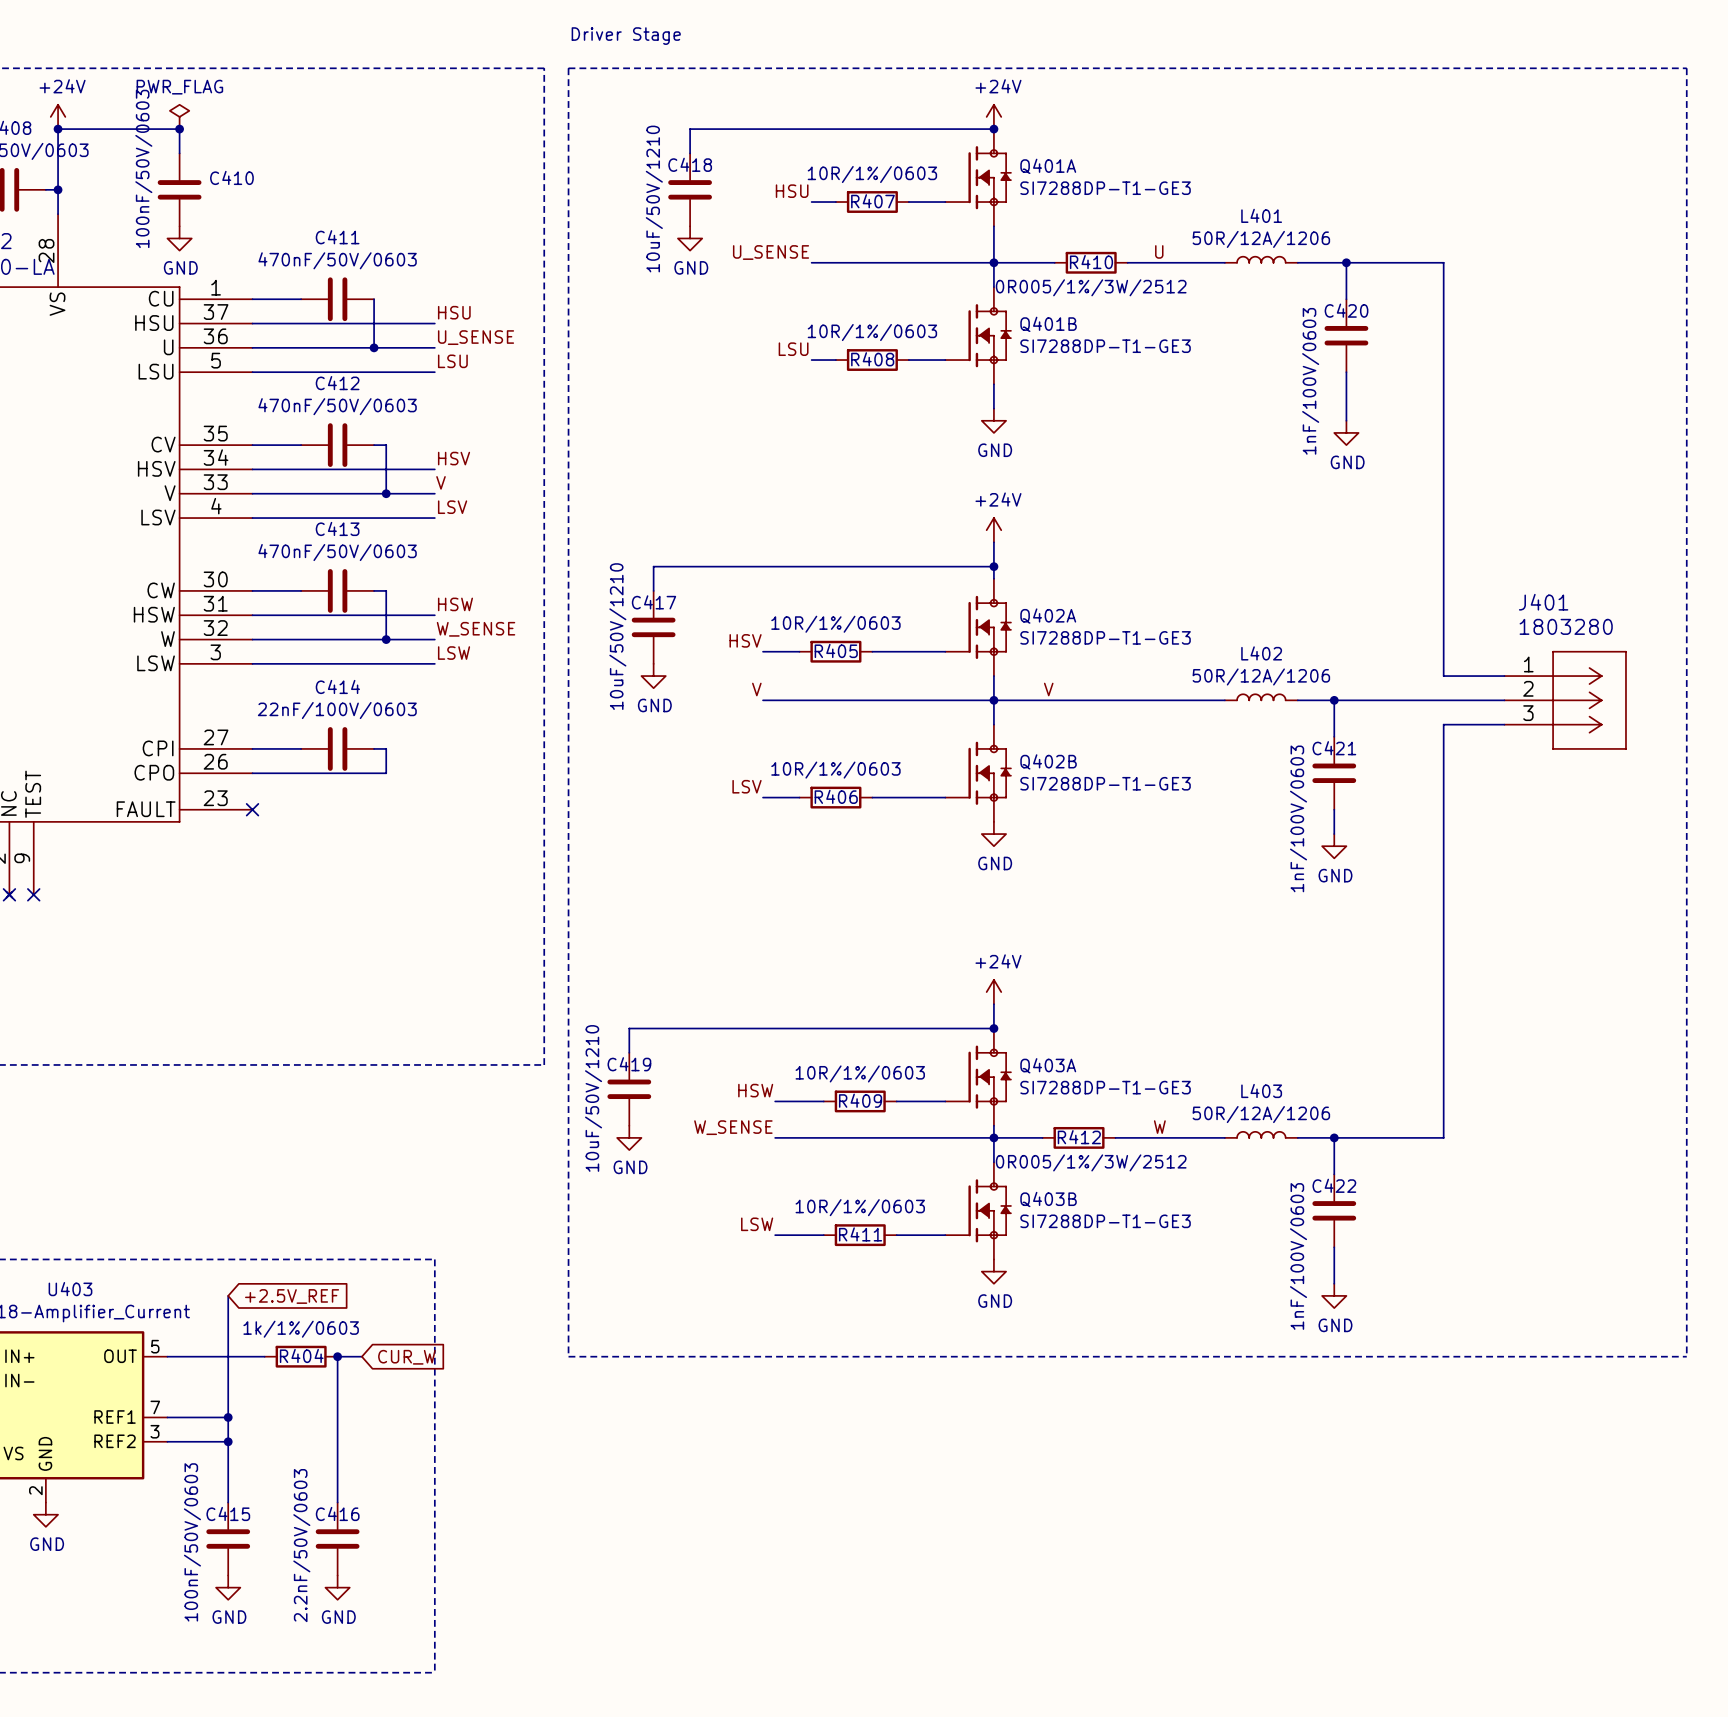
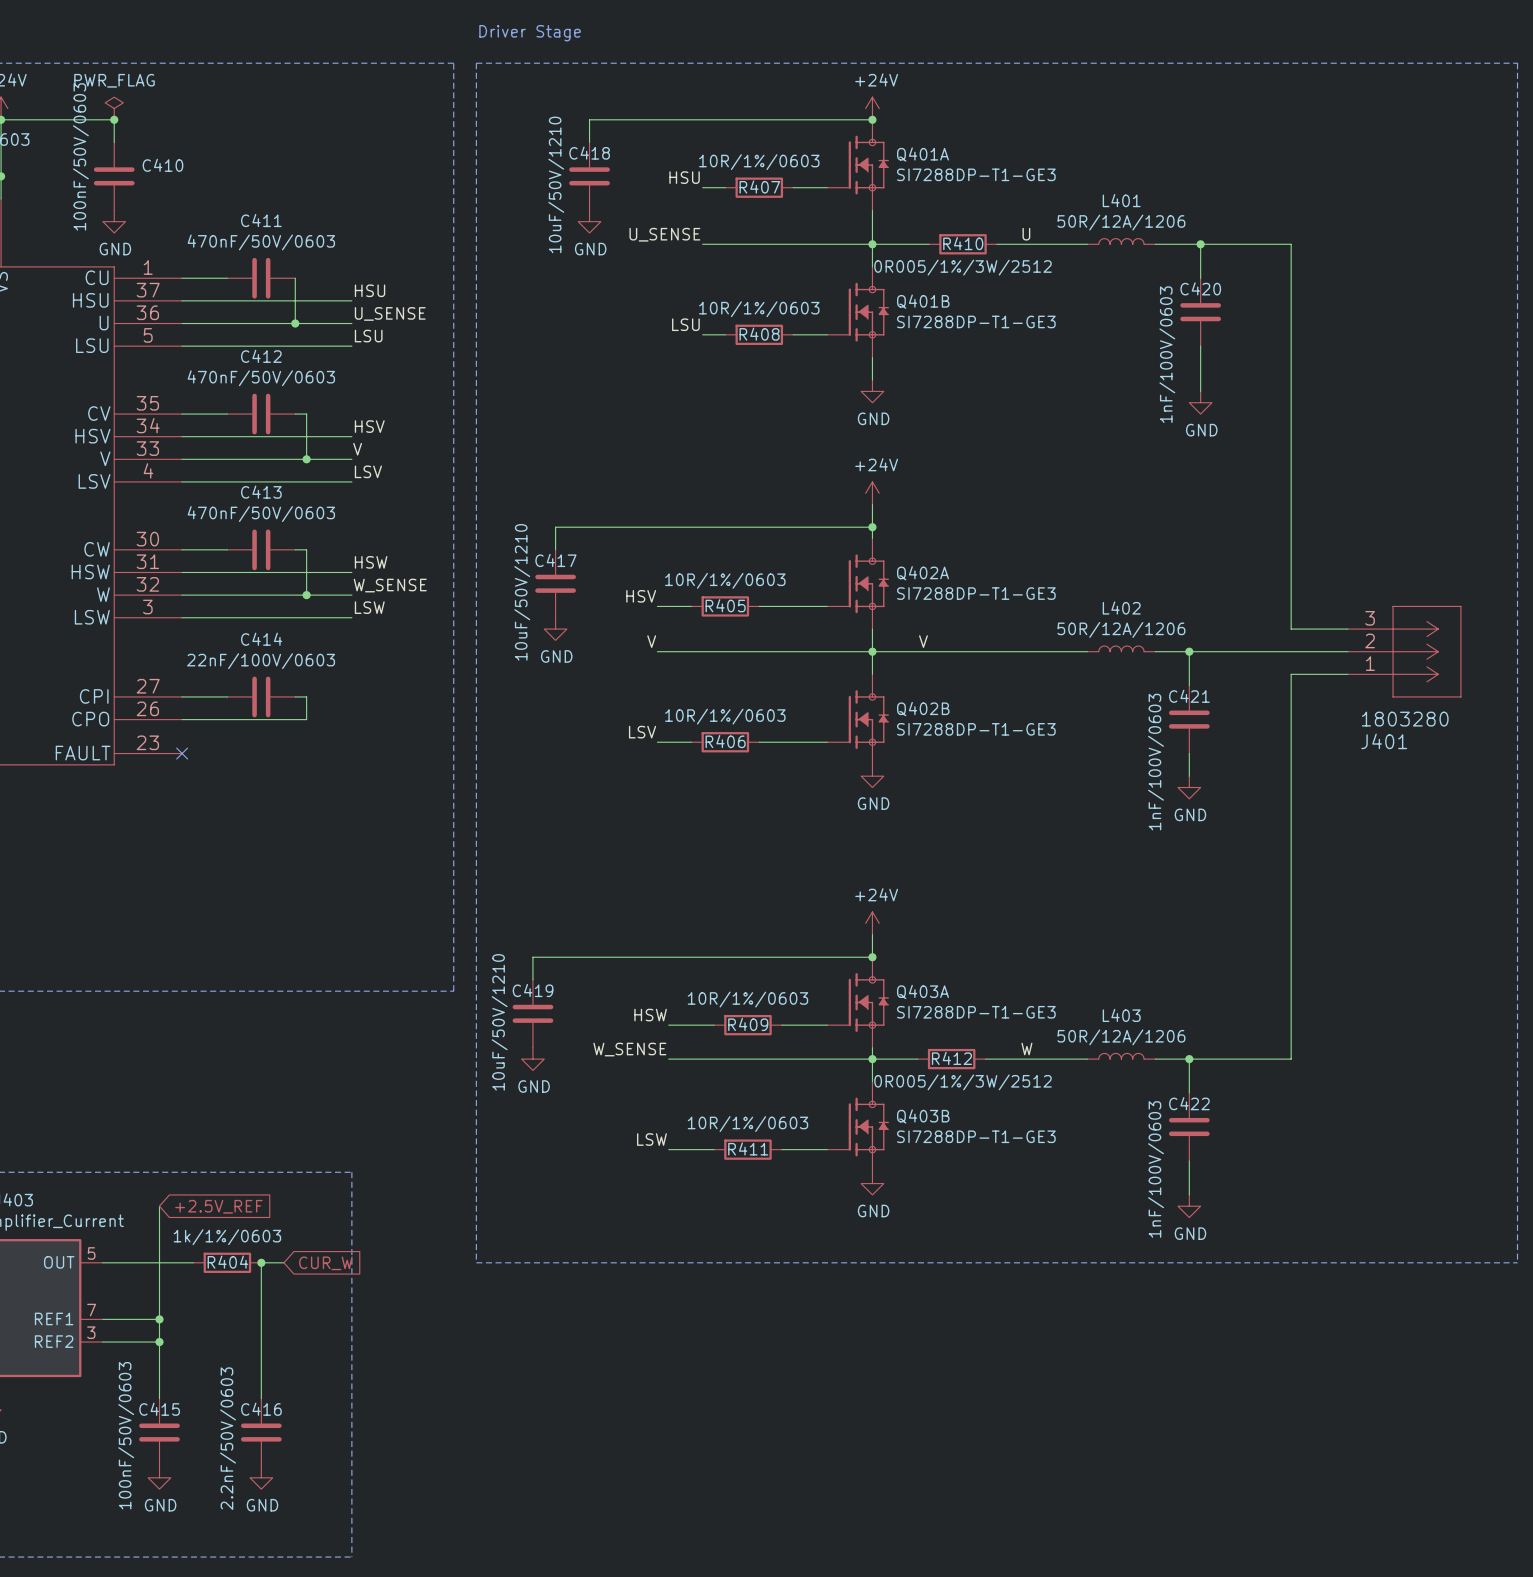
J401 flip: as is (1589, 700) -> up-down (1426, 651)

